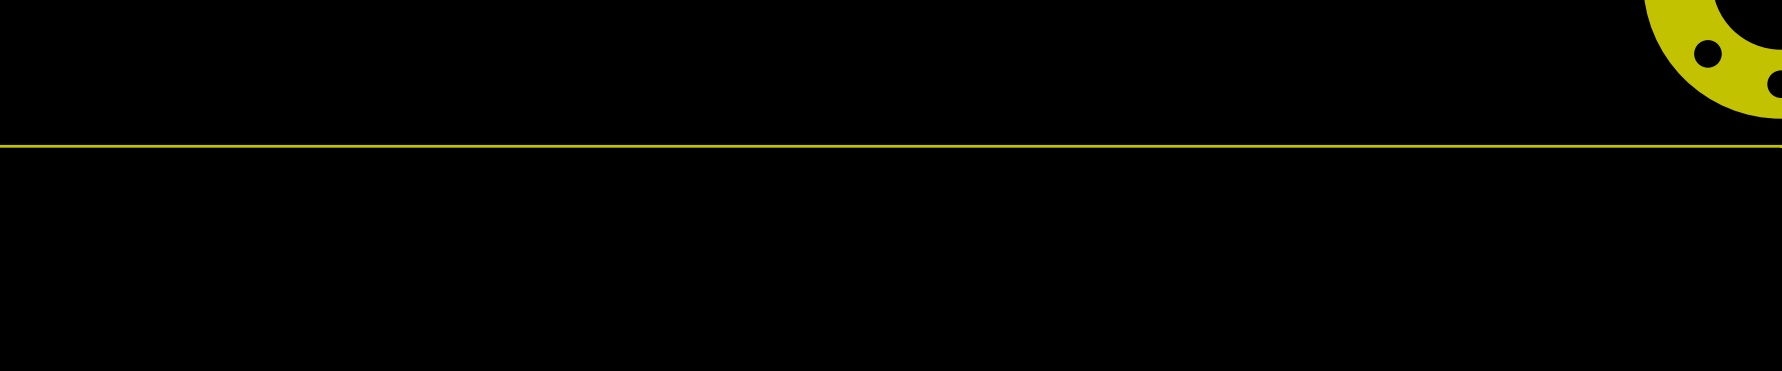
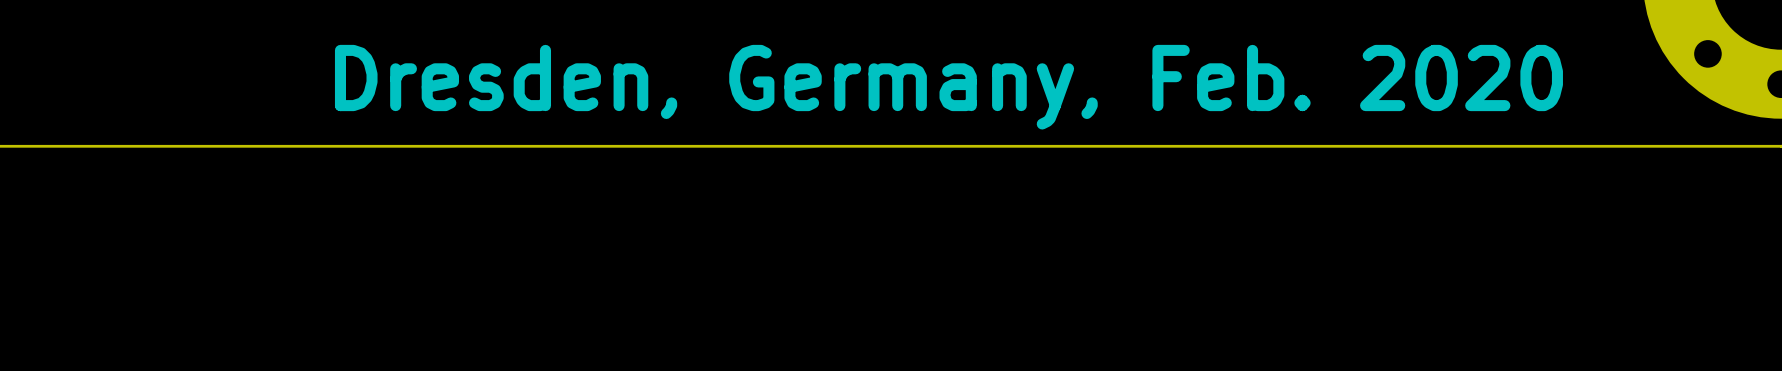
text: none -> Dresden, Germany, Feb. 2020 (948, 87)

